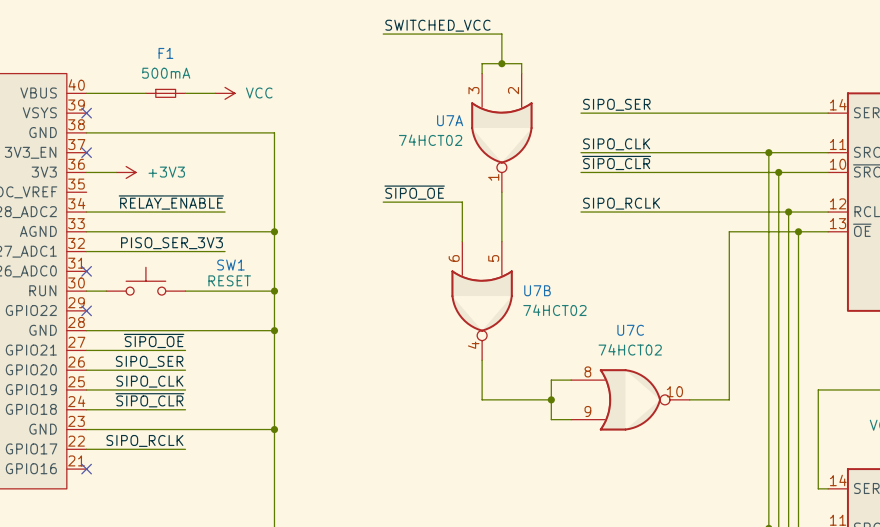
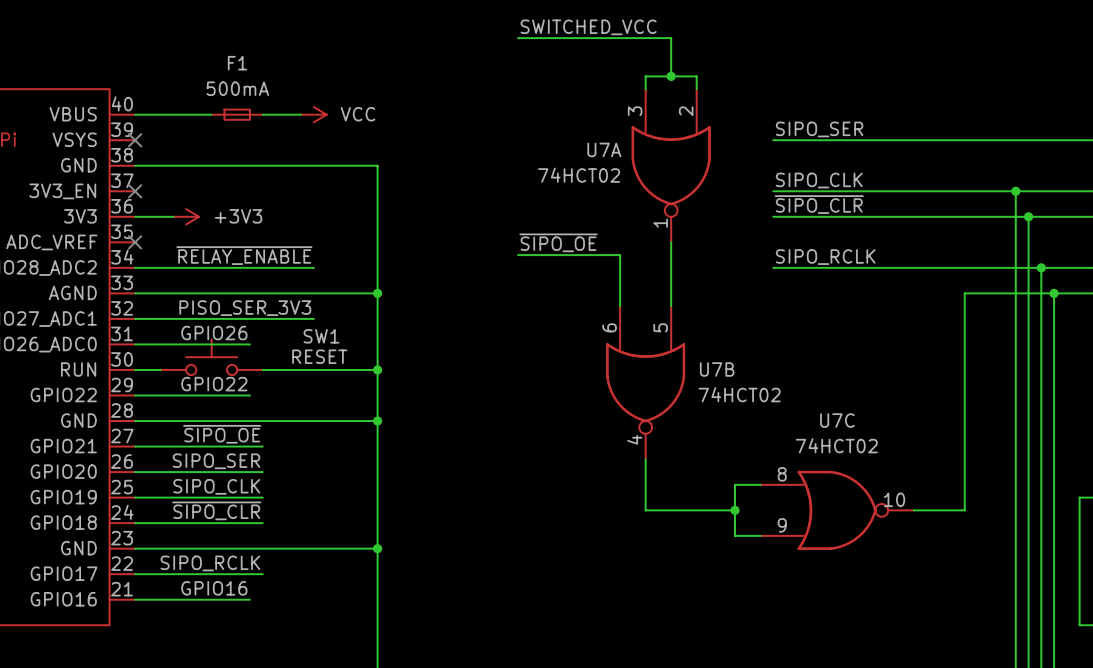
no-connect mark: none -> (135, 242)
label: none -> GPIO26 (214, 333)
wire: none -> (135, 344) (249, 344)
no-connect mark: (86, 271) -> none
label: none -> GPIO22 (214, 384)
wire: none -> (135, 395) (249, 395)
no-connect mark: (86, 310) -> none
label: none -> GPIO16 (214, 588)
wire: none -> (135, 599) (249, 599)
no-connect mark: (86, 469) -> none

